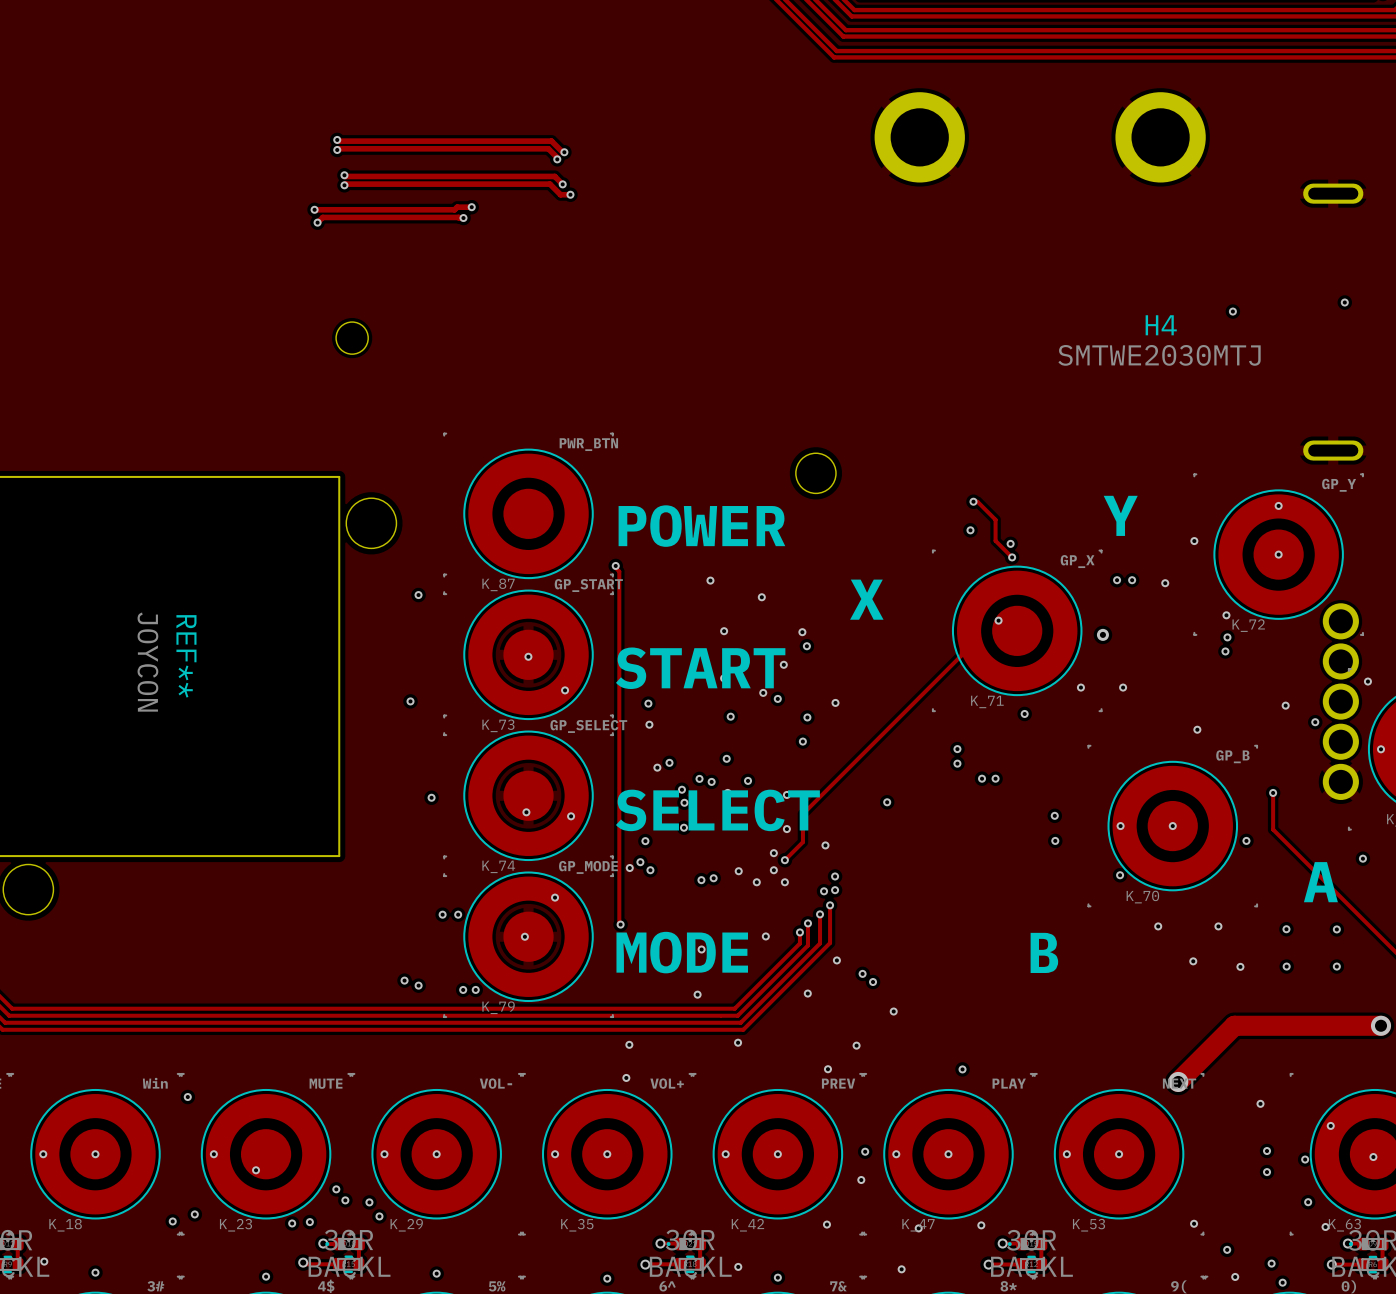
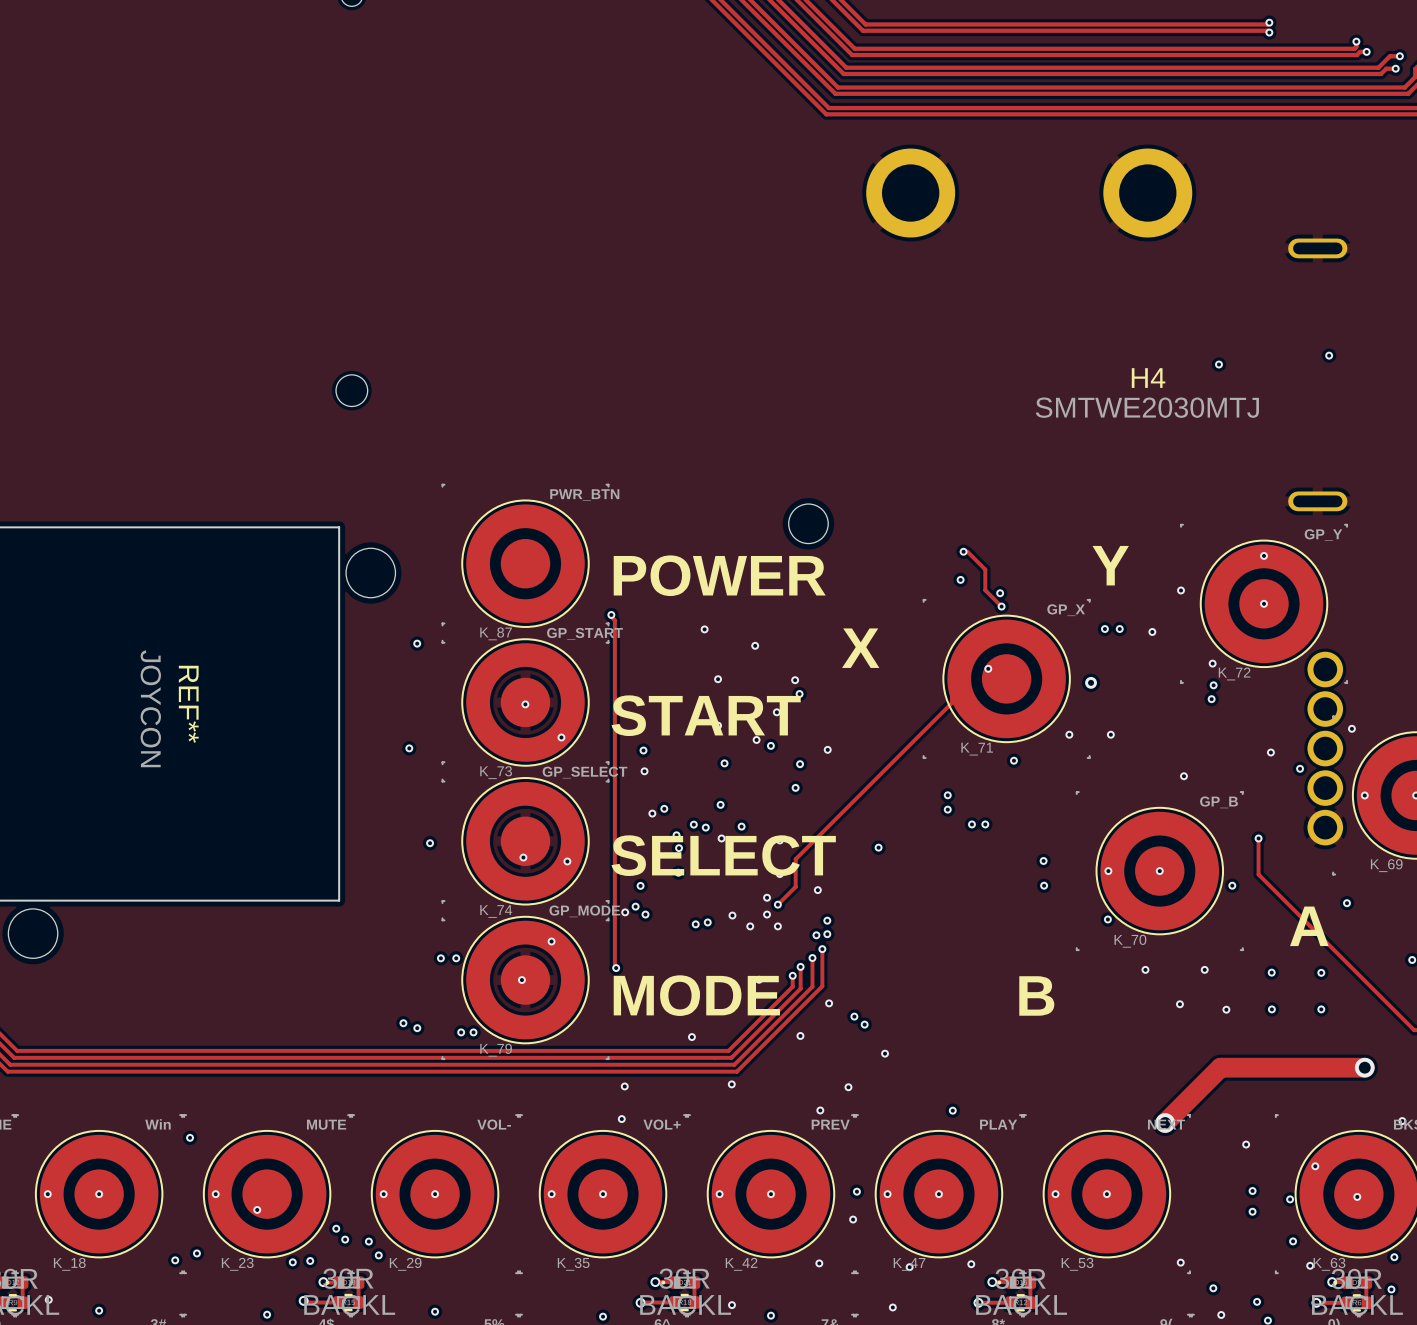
track: (337, 139) (551, 141) (564, 152) -> none
via: (337, 139) -> none
track: (337, 149) (548, 148) (557, 159) -> none
via: (337, 149) -> none
via: (564, 152) -> none
via: (557, 159) -> none
track: (344, 175) (554, 176) (562, 184) -> none
via: (344, 175) -> none
via: (562, 184) -> none
track: (344, 185) (549, 184) (560, 194) (570, 194) -> none
via: (344, 185) -> none
via: (570, 194) -> none
track: (471, 207) (457, 207) (454, 209) (314, 209) -> none
via: (471, 207) -> none
via: (314, 209) -> none
track: (463, 218) (322, 217) (317, 222) -> none
via: (463, 218) -> none
via: (317, 222) -> none

